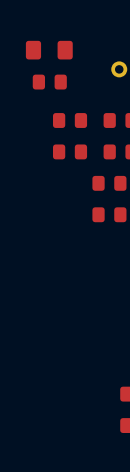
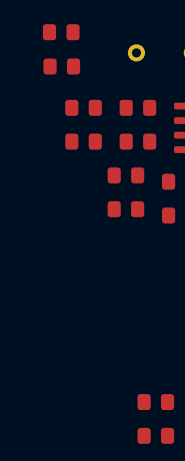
part footprint: [25, 40, 73, 60] -> [42, 24, 80, 41]

